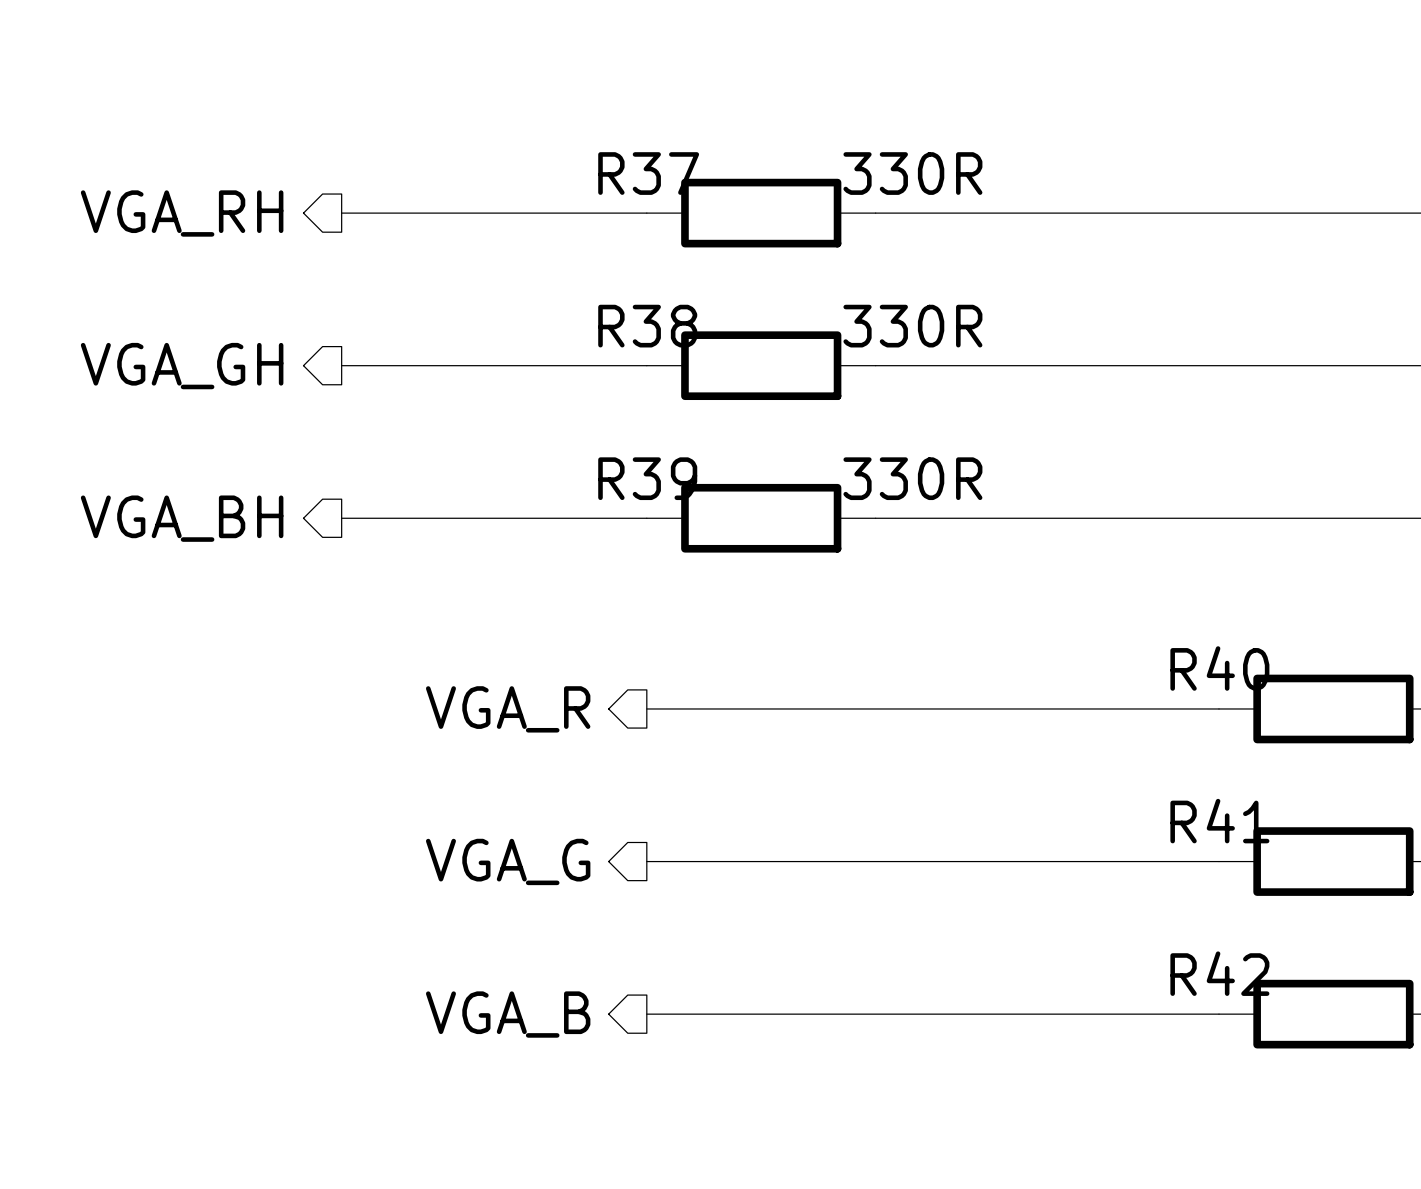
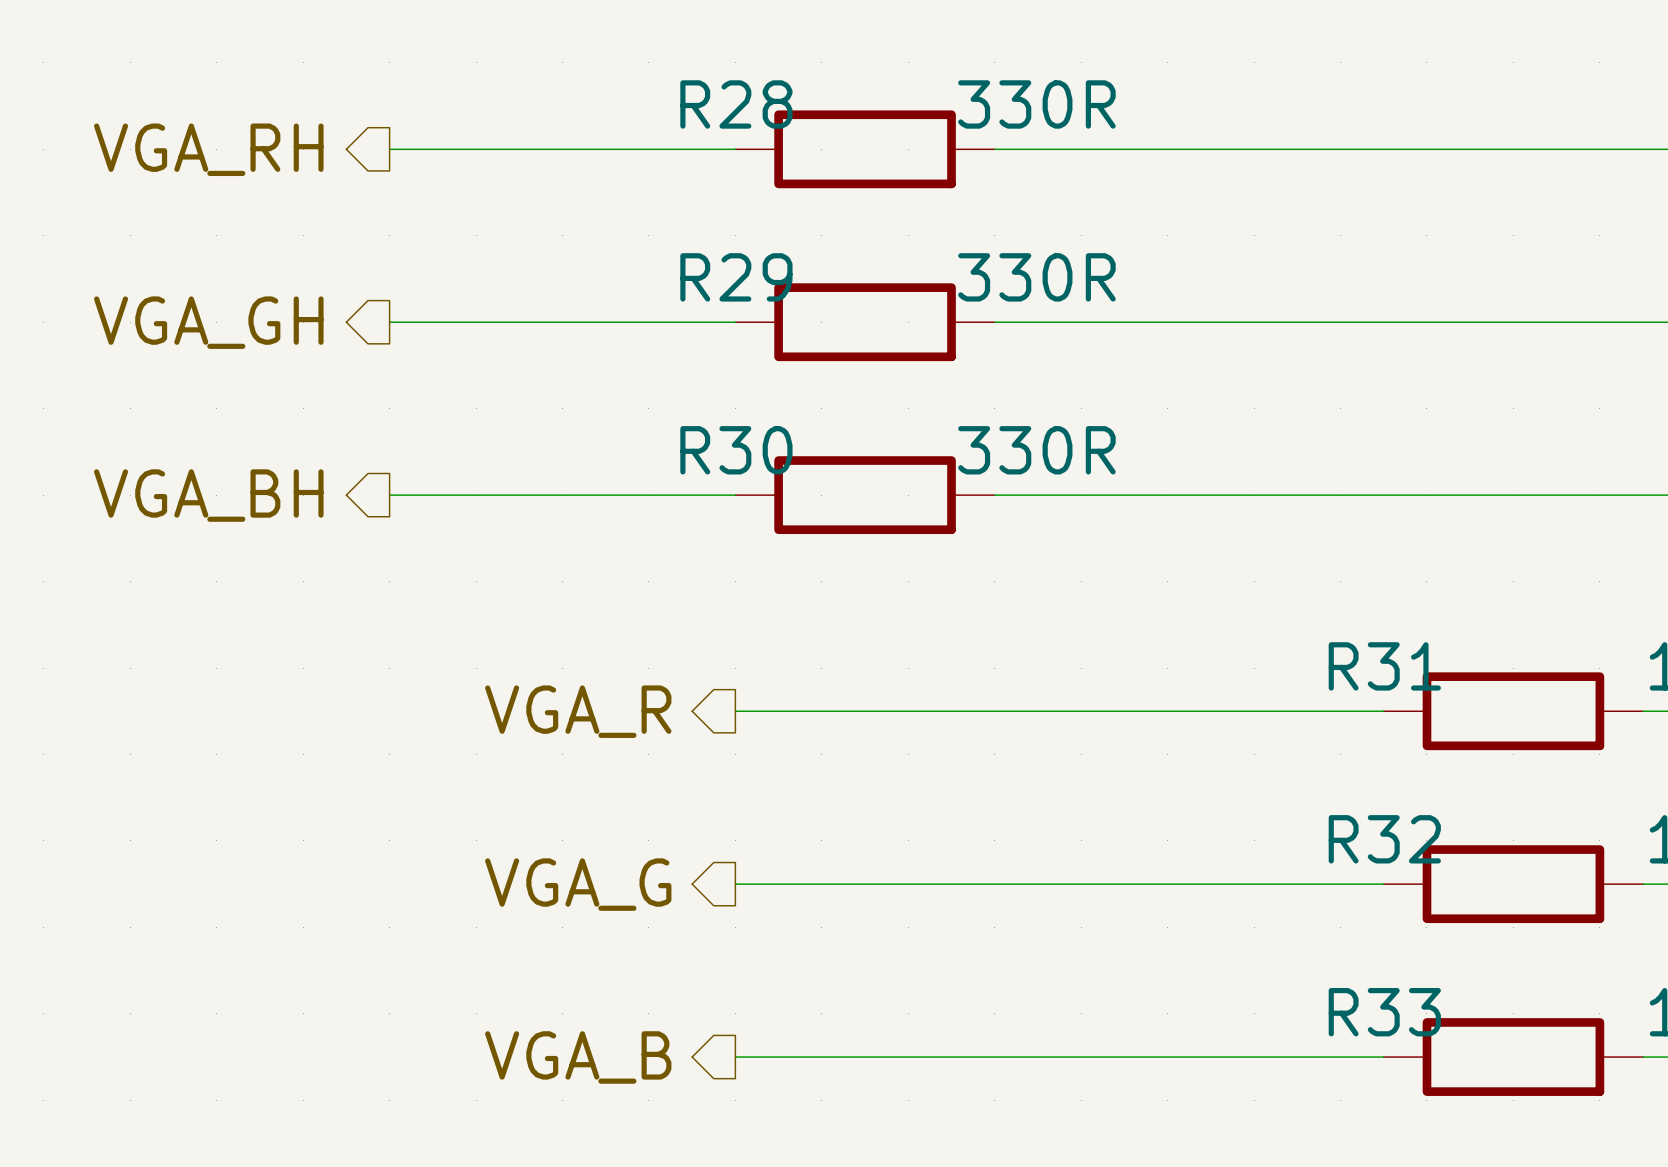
R37 name: R37 (648, 173) -> R28 (736, 104)
R38 name: R38 (647, 326) -> R29 (736, 277)
R39 name: R39 (647, 478) -> R30 (736, 450)
R40 name: R40 (1219, 668) -> R31 (1384, 666)
R41 name: R41 (1219, 821) -> R32 (1384, 839)
R42 name: R42 (1219, 973) -> R33 (1384, 1012)

